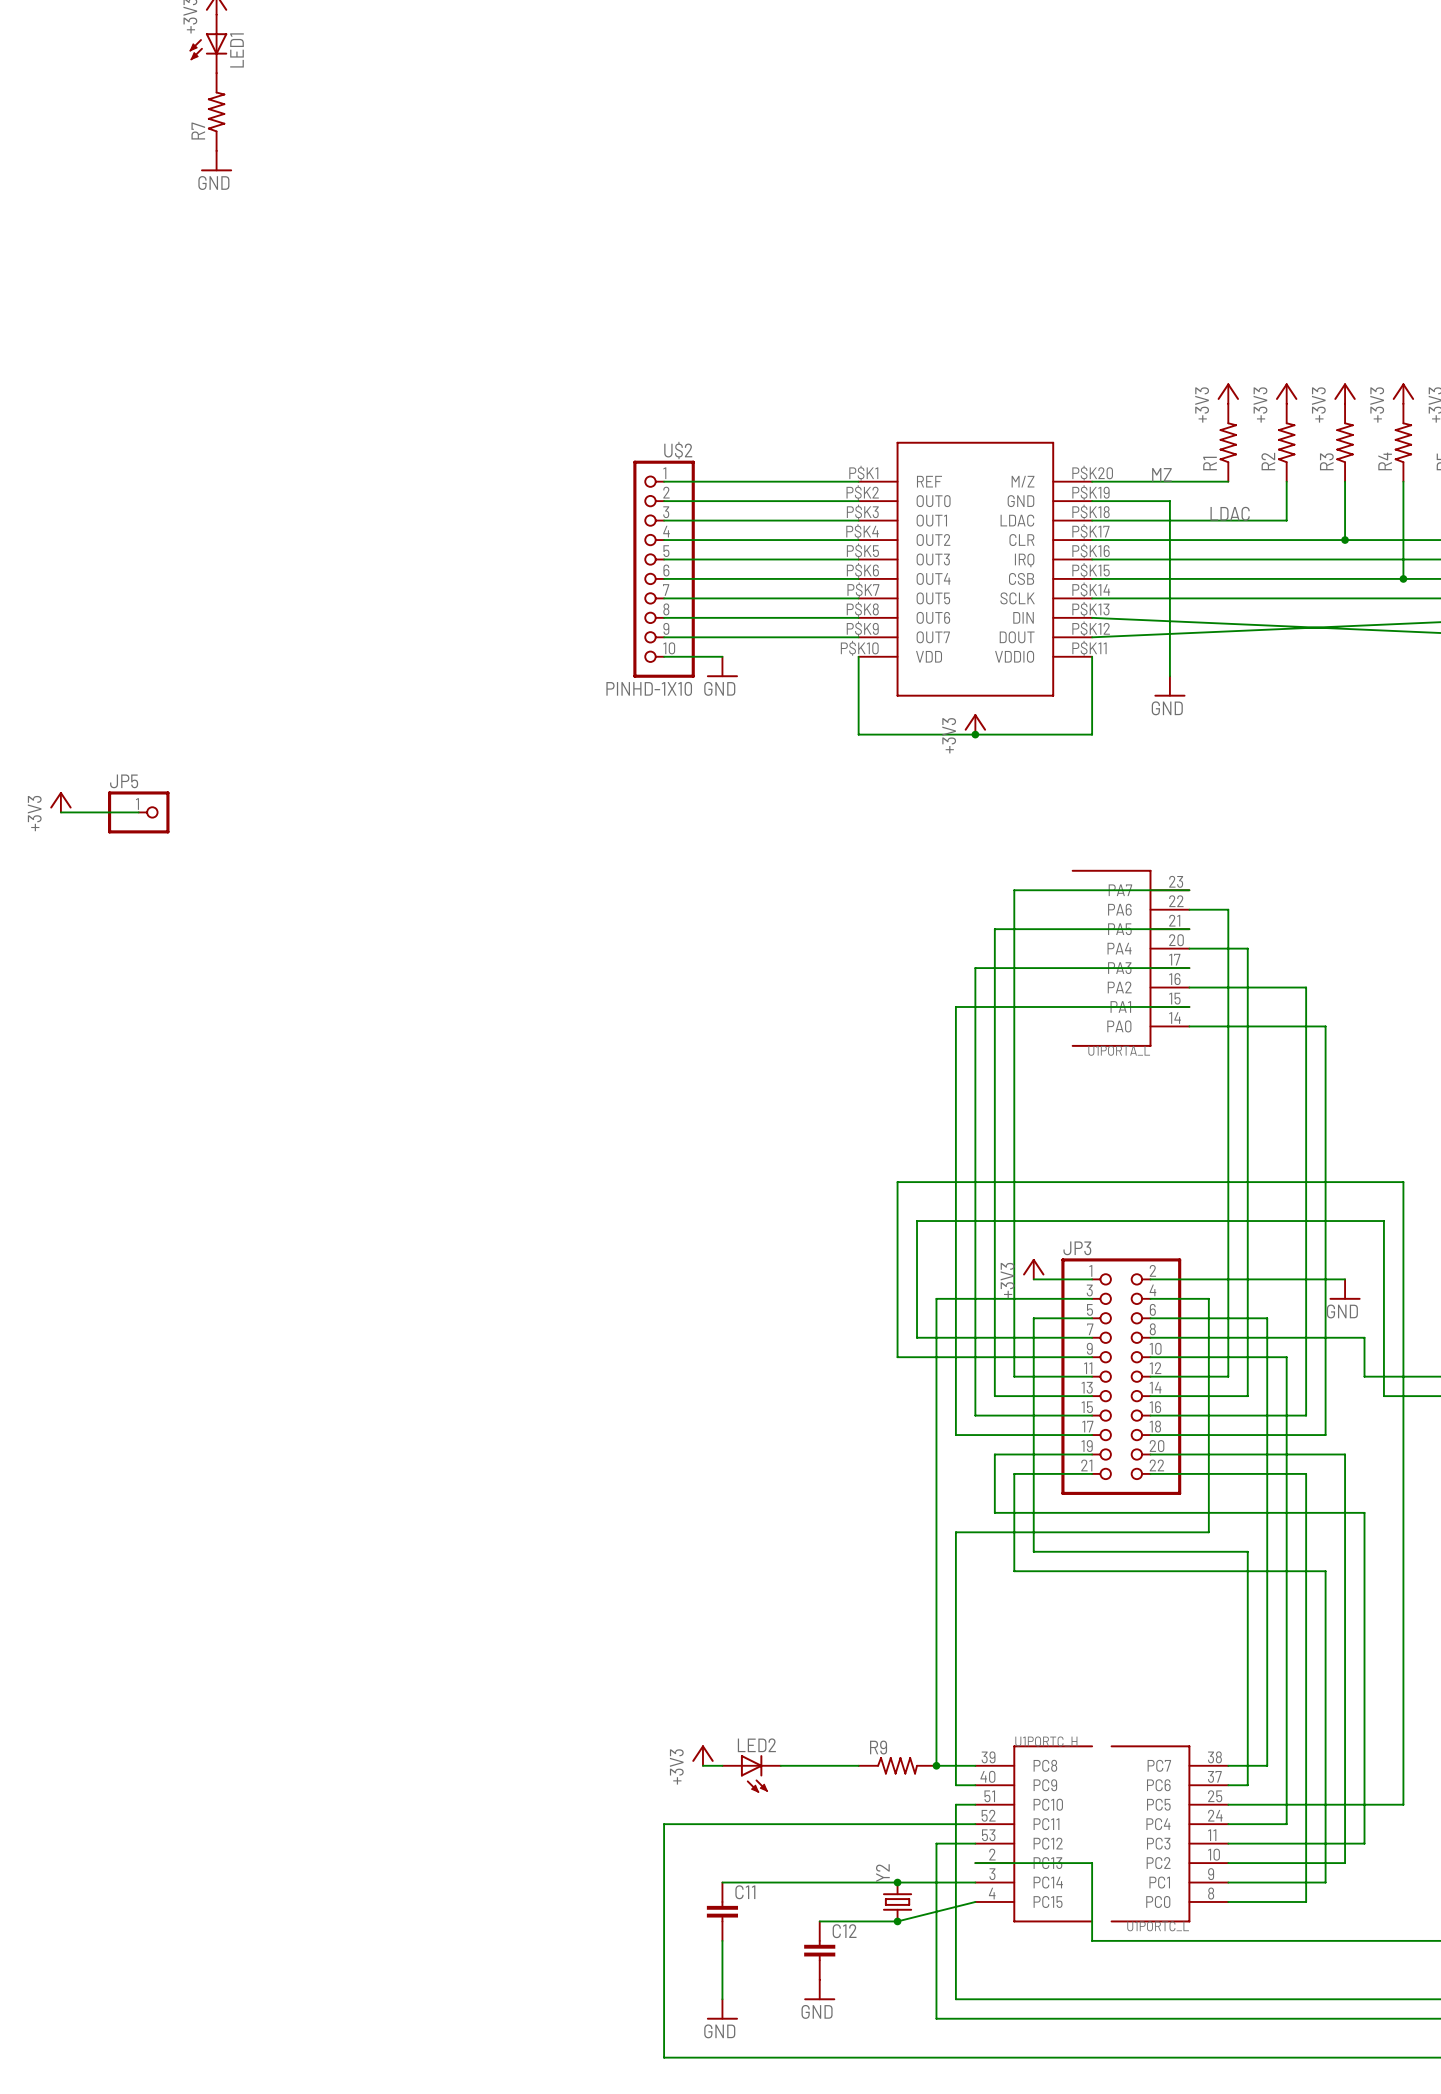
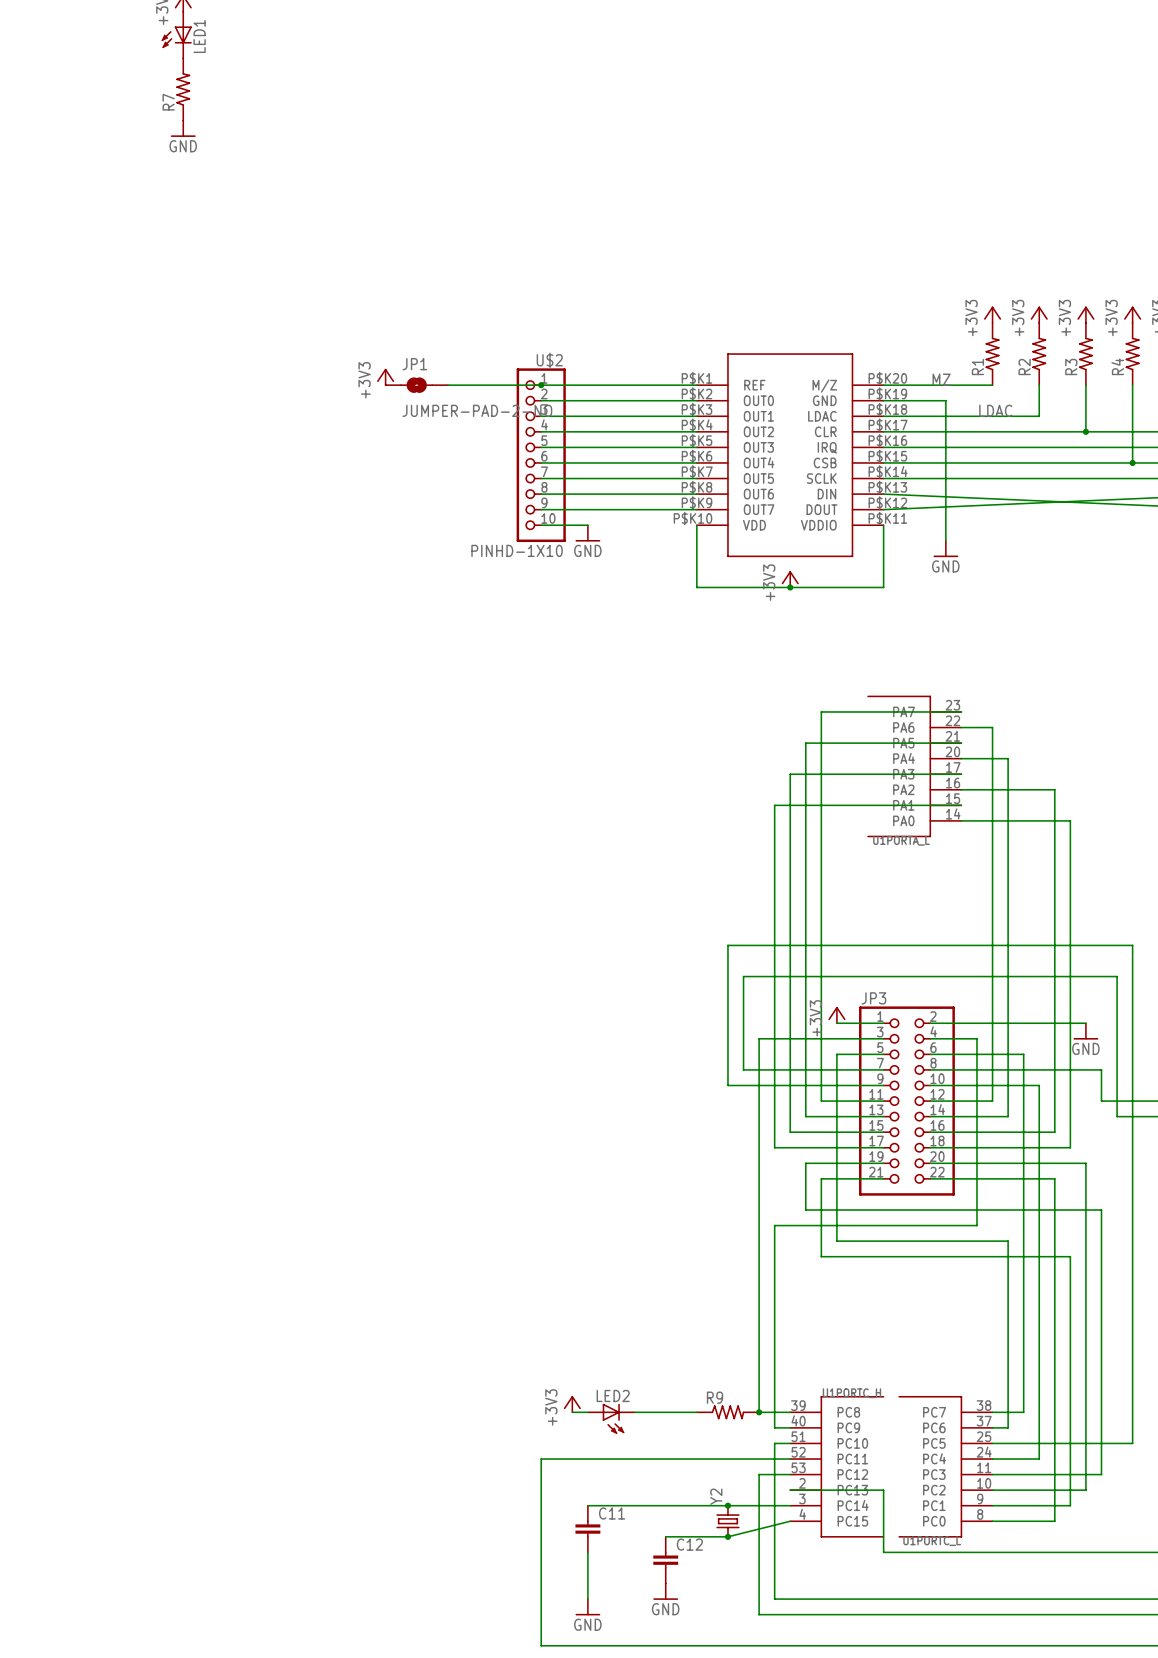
power symbol: none -> +3V3 (385, 376)
JP1: none -> JUMPER-PAD-2-NO (416, 385)
wire: none -> (447, 385) (541, 385)
junction: none -> (541, 385)
power symbol: +3V3 (60, 802) -> none
wire: (60, 812) (138, 812) -> none
JP5: (138, 812) -> none

